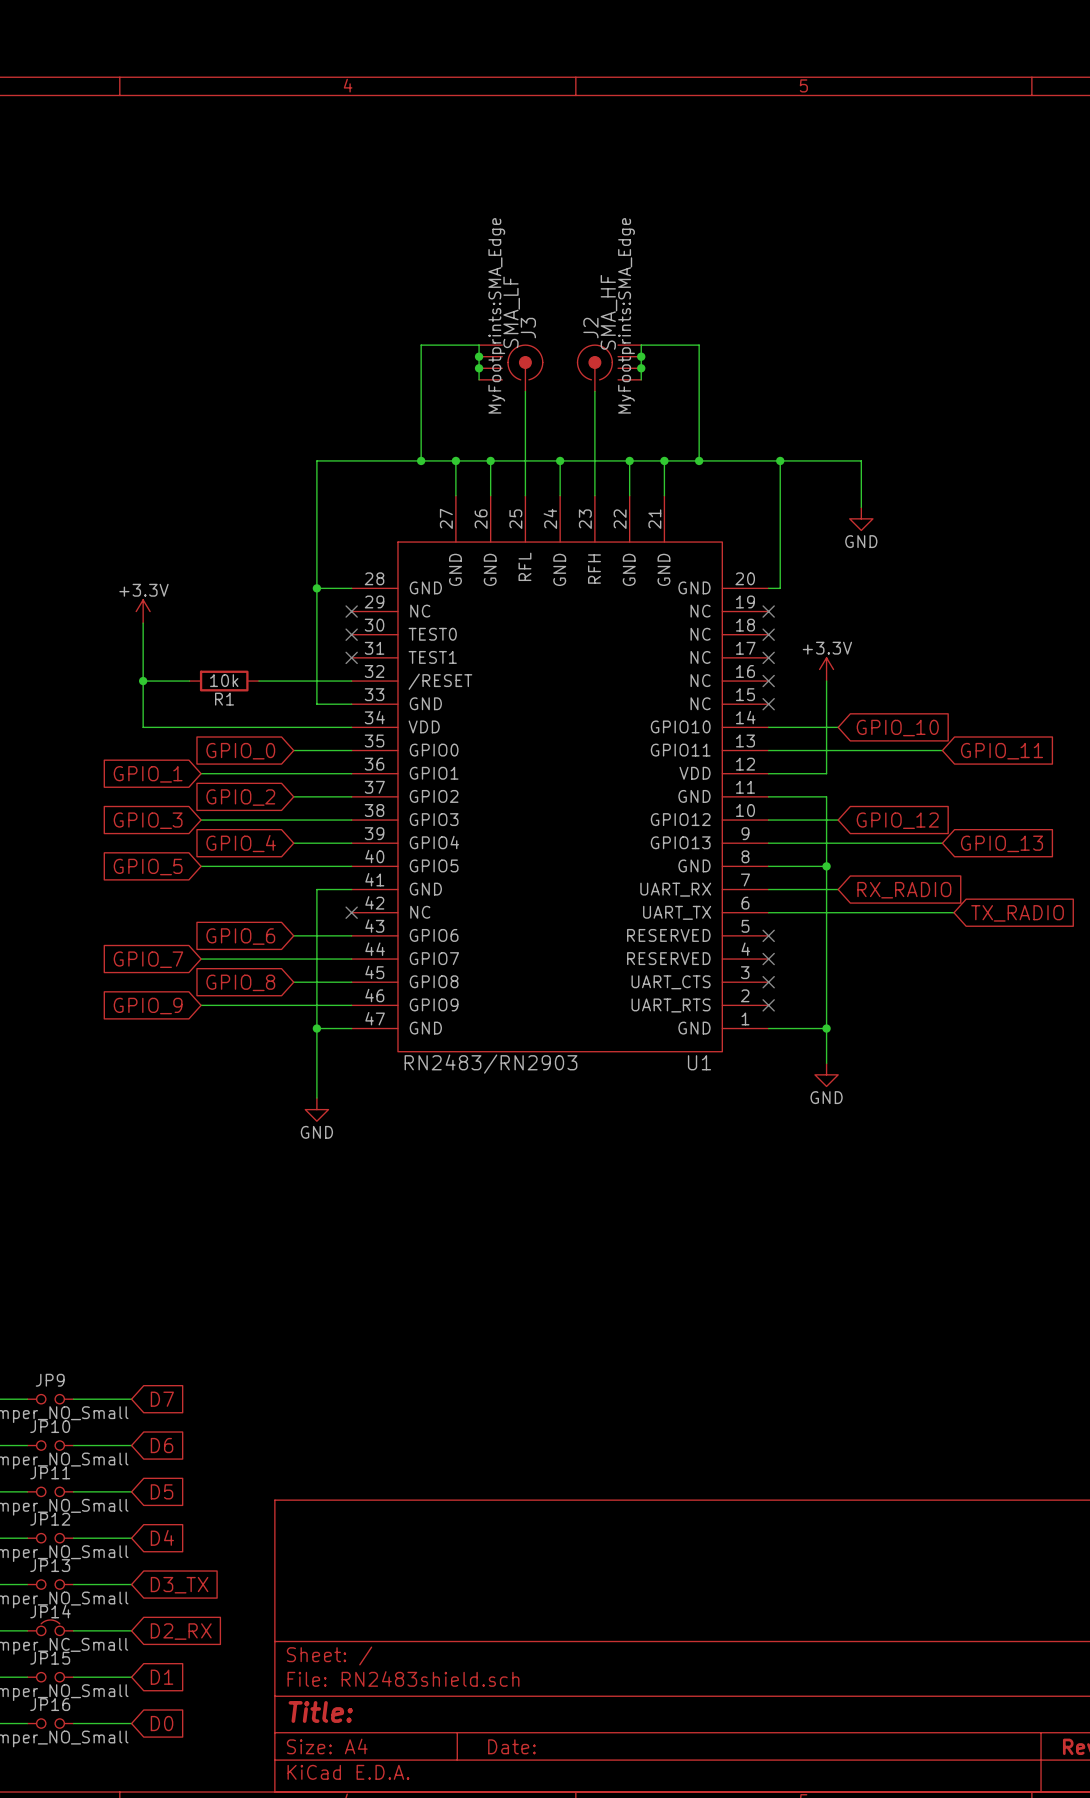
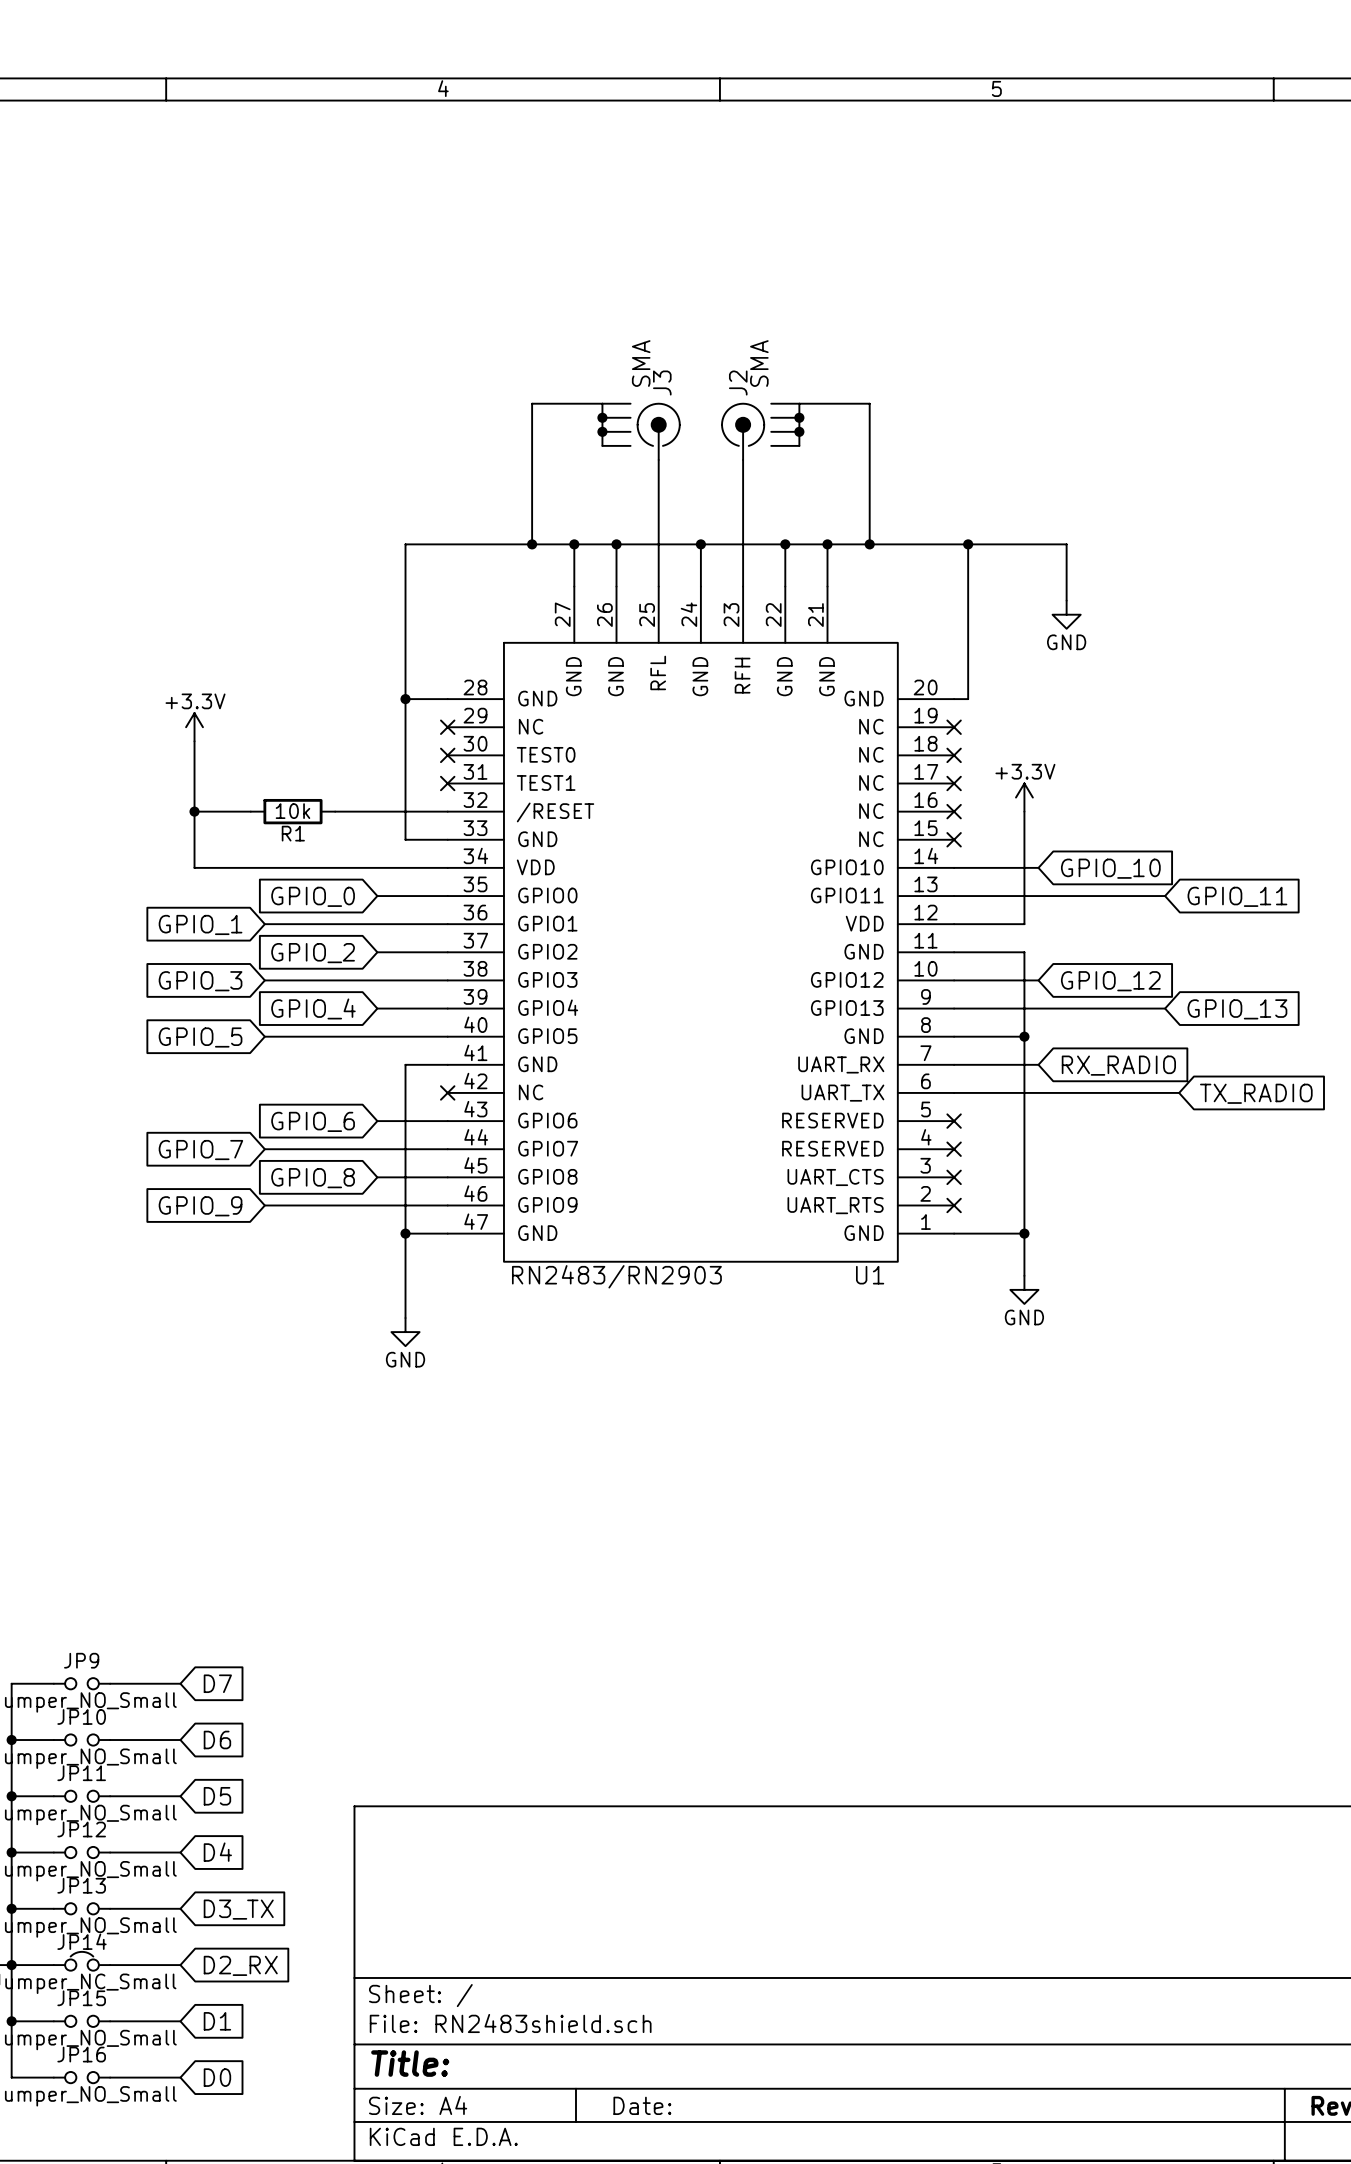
J3 value: SMA_LF (511, 312) -> SMA (641, 363)
J2 value: SMA_HF (608, 312) -> SMA (759, 363)
J3 text: MyFootprints:SMA_Edge (496, 315) -> none
J2 text: MyFootprints:SMA_Edge (626, 315) -> none

